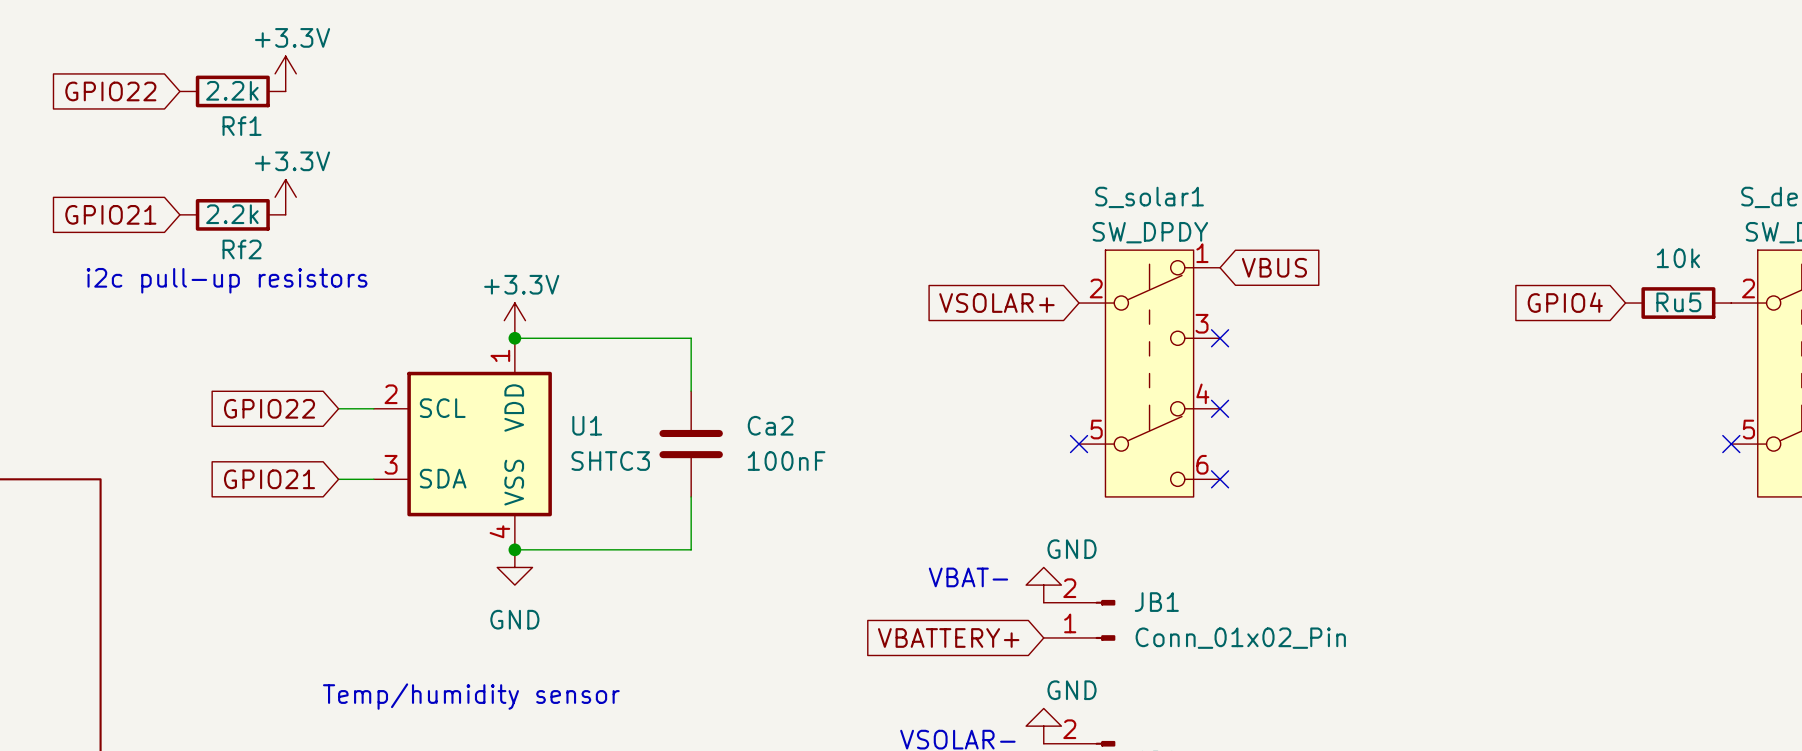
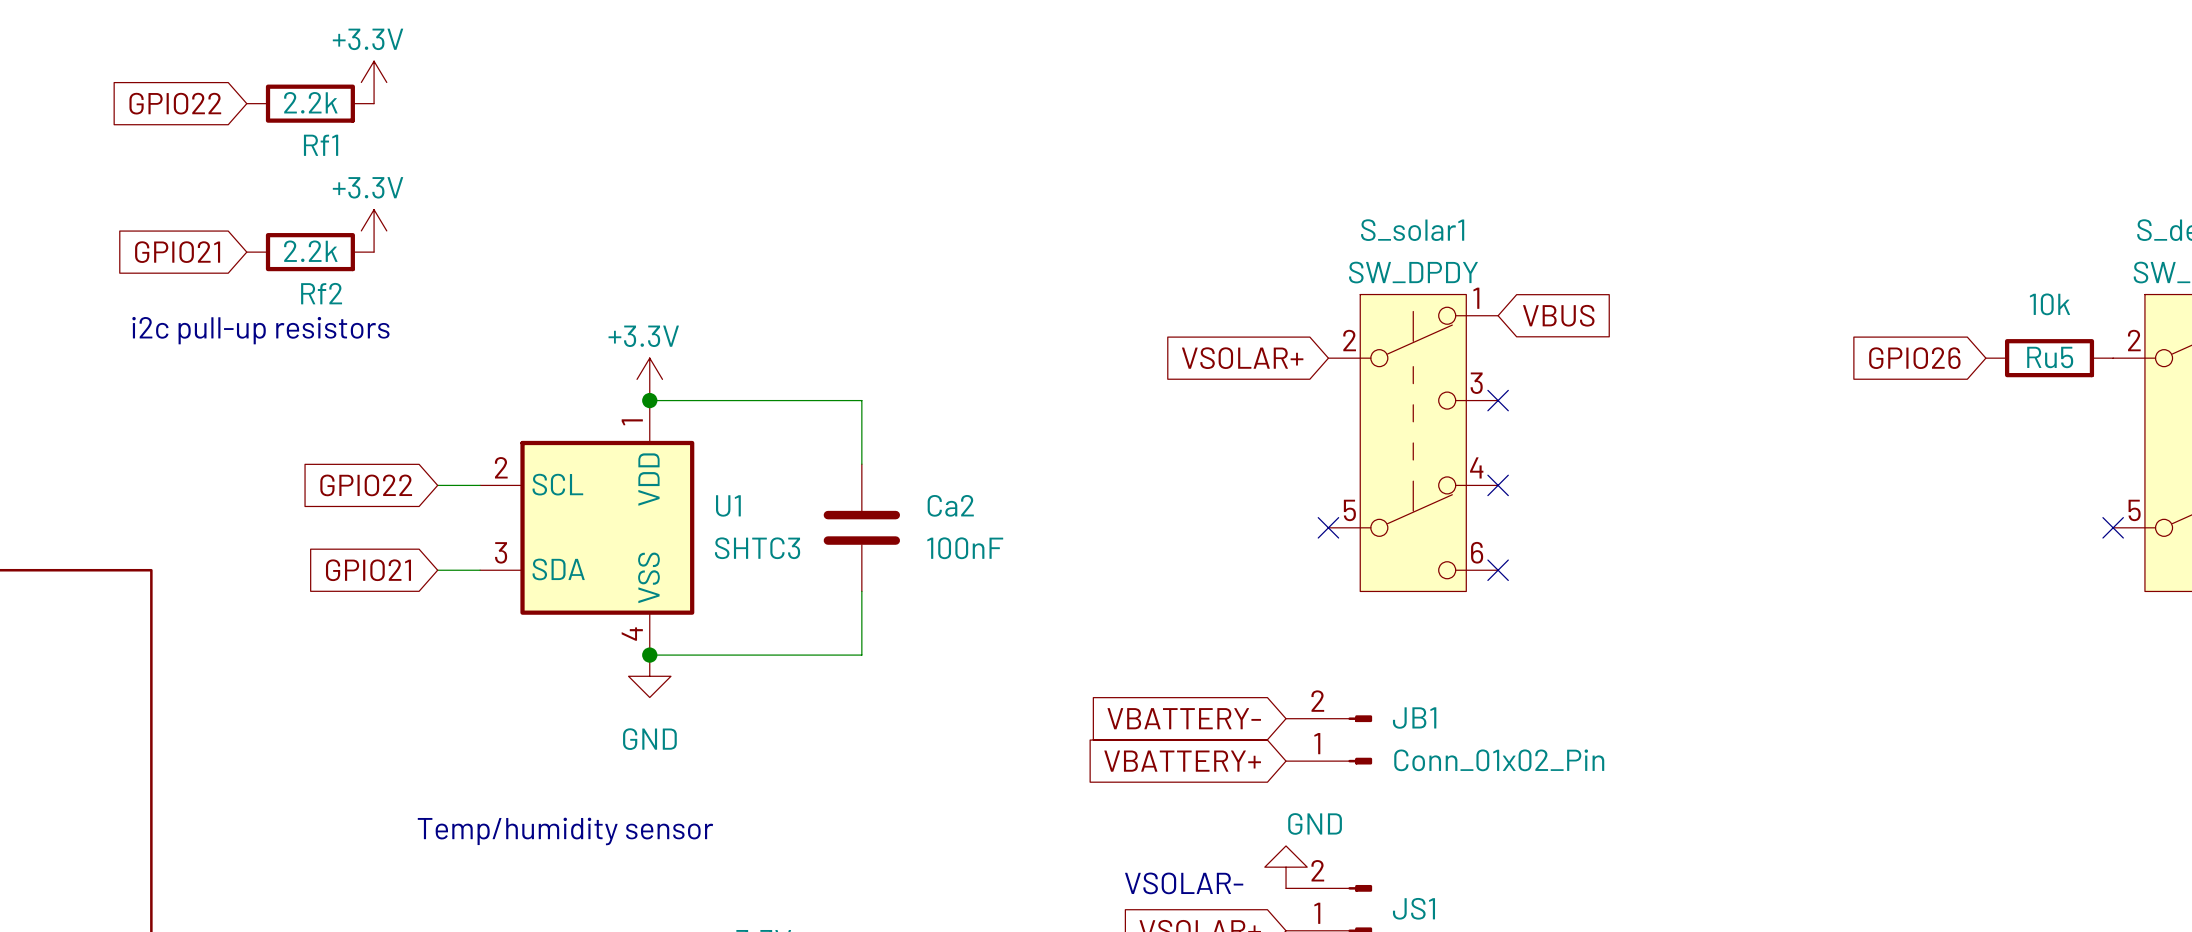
global label: GPIO4 (1565, 302) -> GPIO26 (1914, 358)
text: VBAT- (968, 577) -> none
power symbol: GND (1043, 585) -> none
global label: none -> VBATTERY- (1184, 718)

